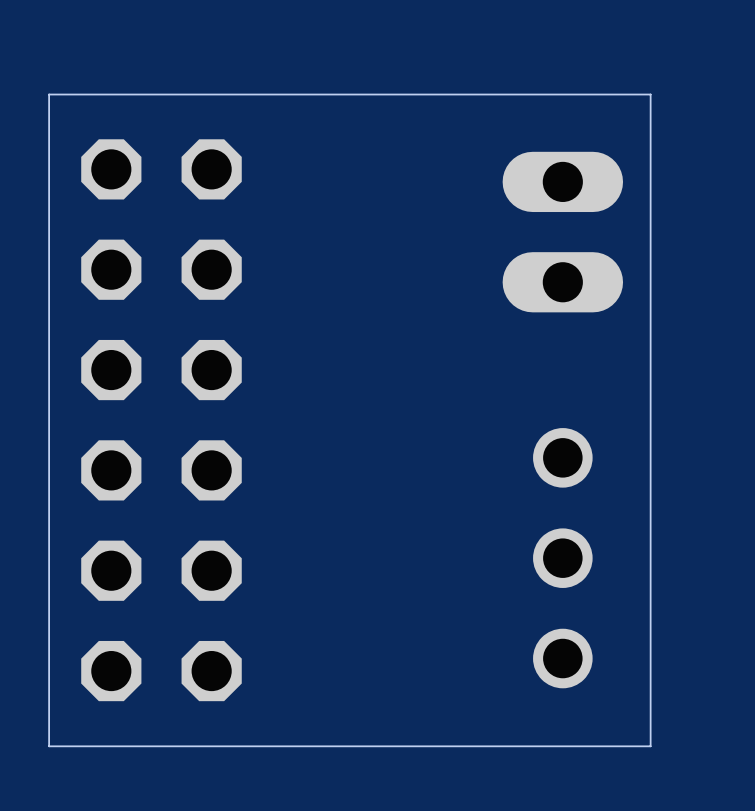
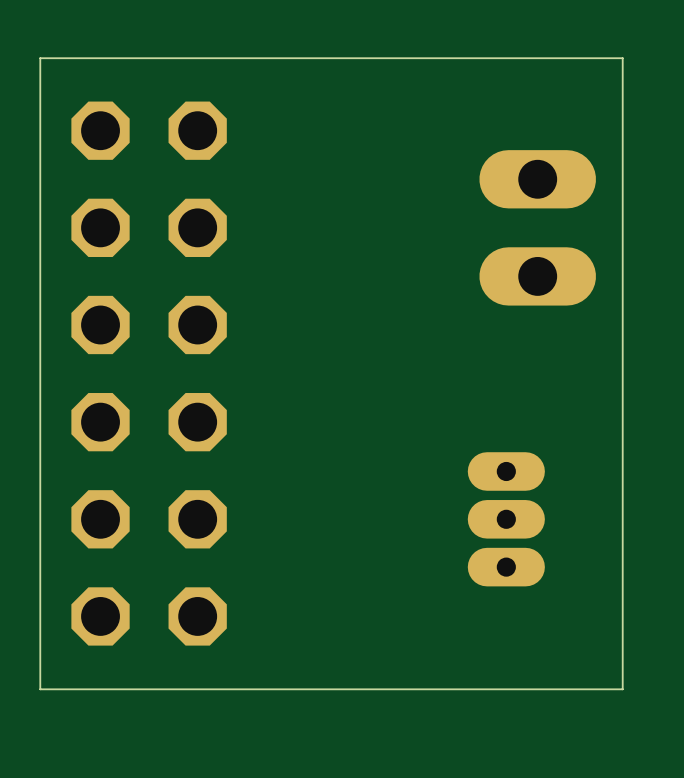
part position: (562, 232) -> (537, 227)
part footprint: [533, 428, 593, 689] -> [467, 452, 545, 587]

